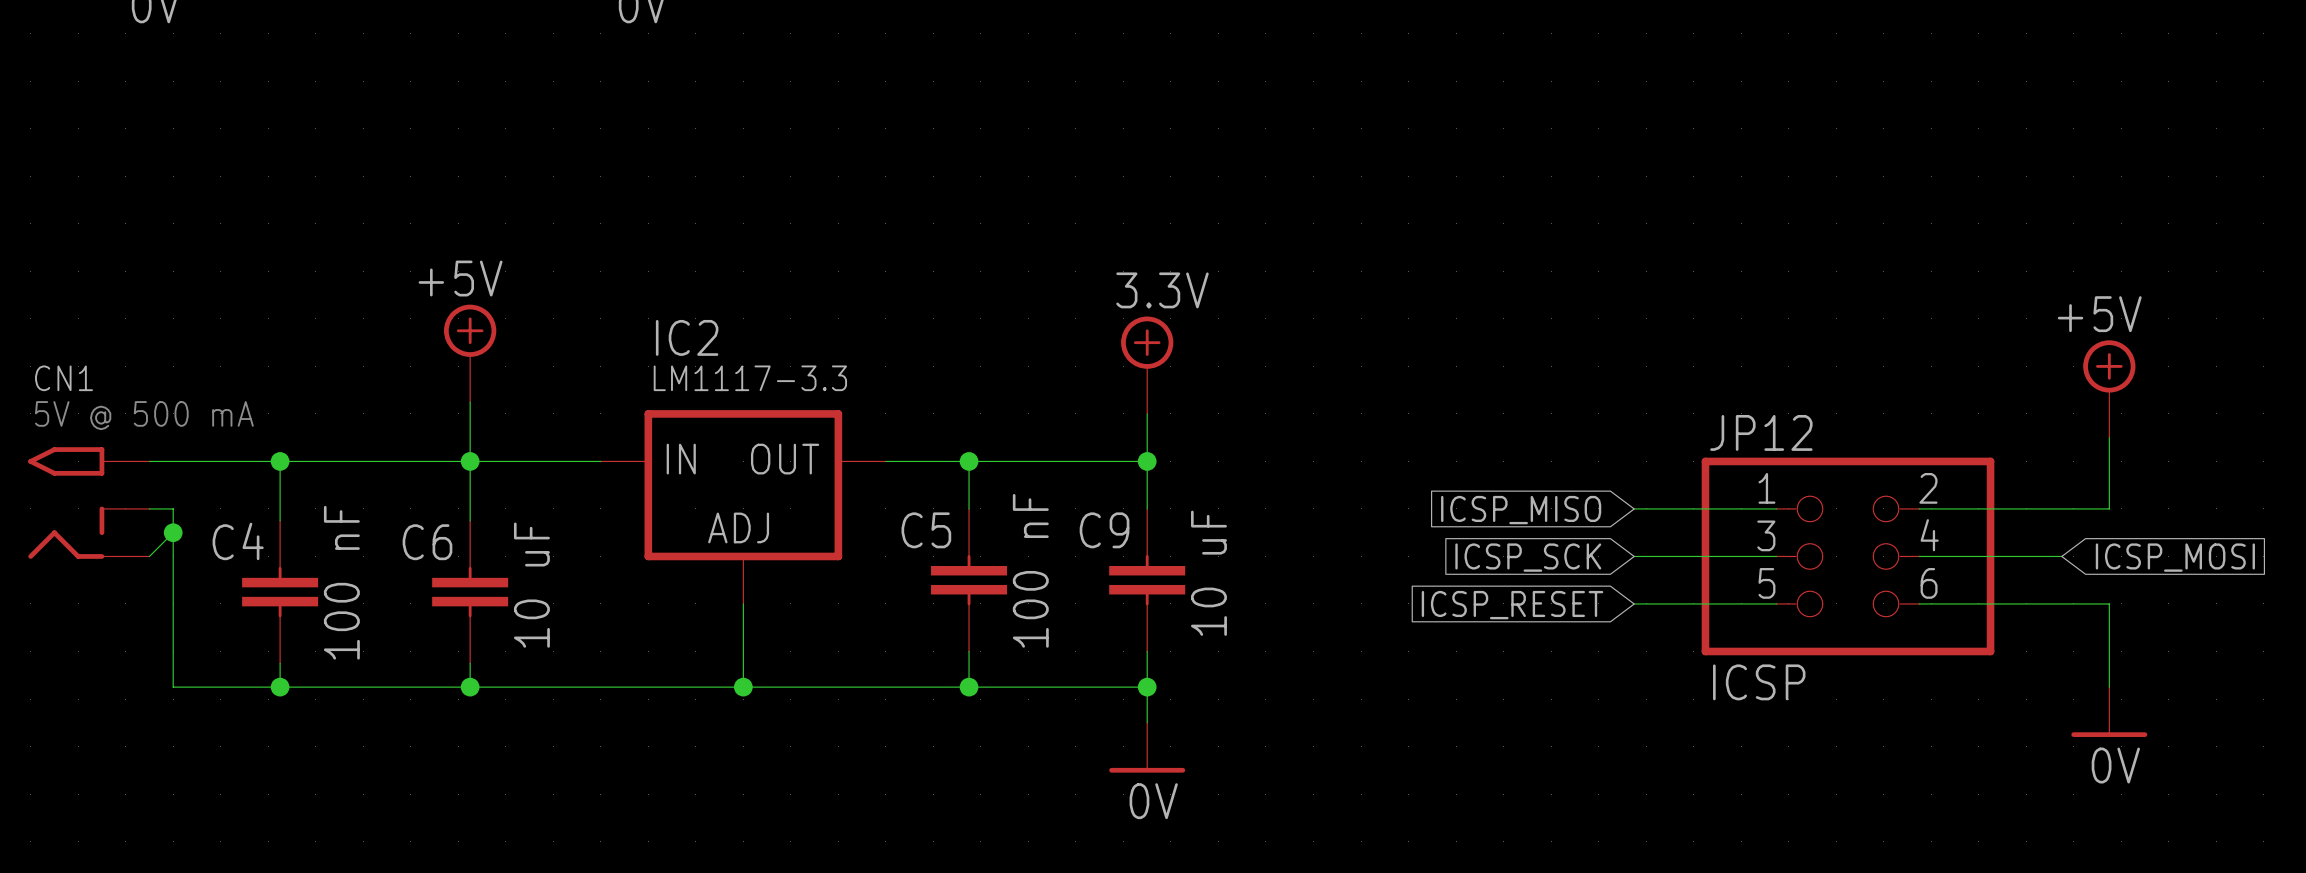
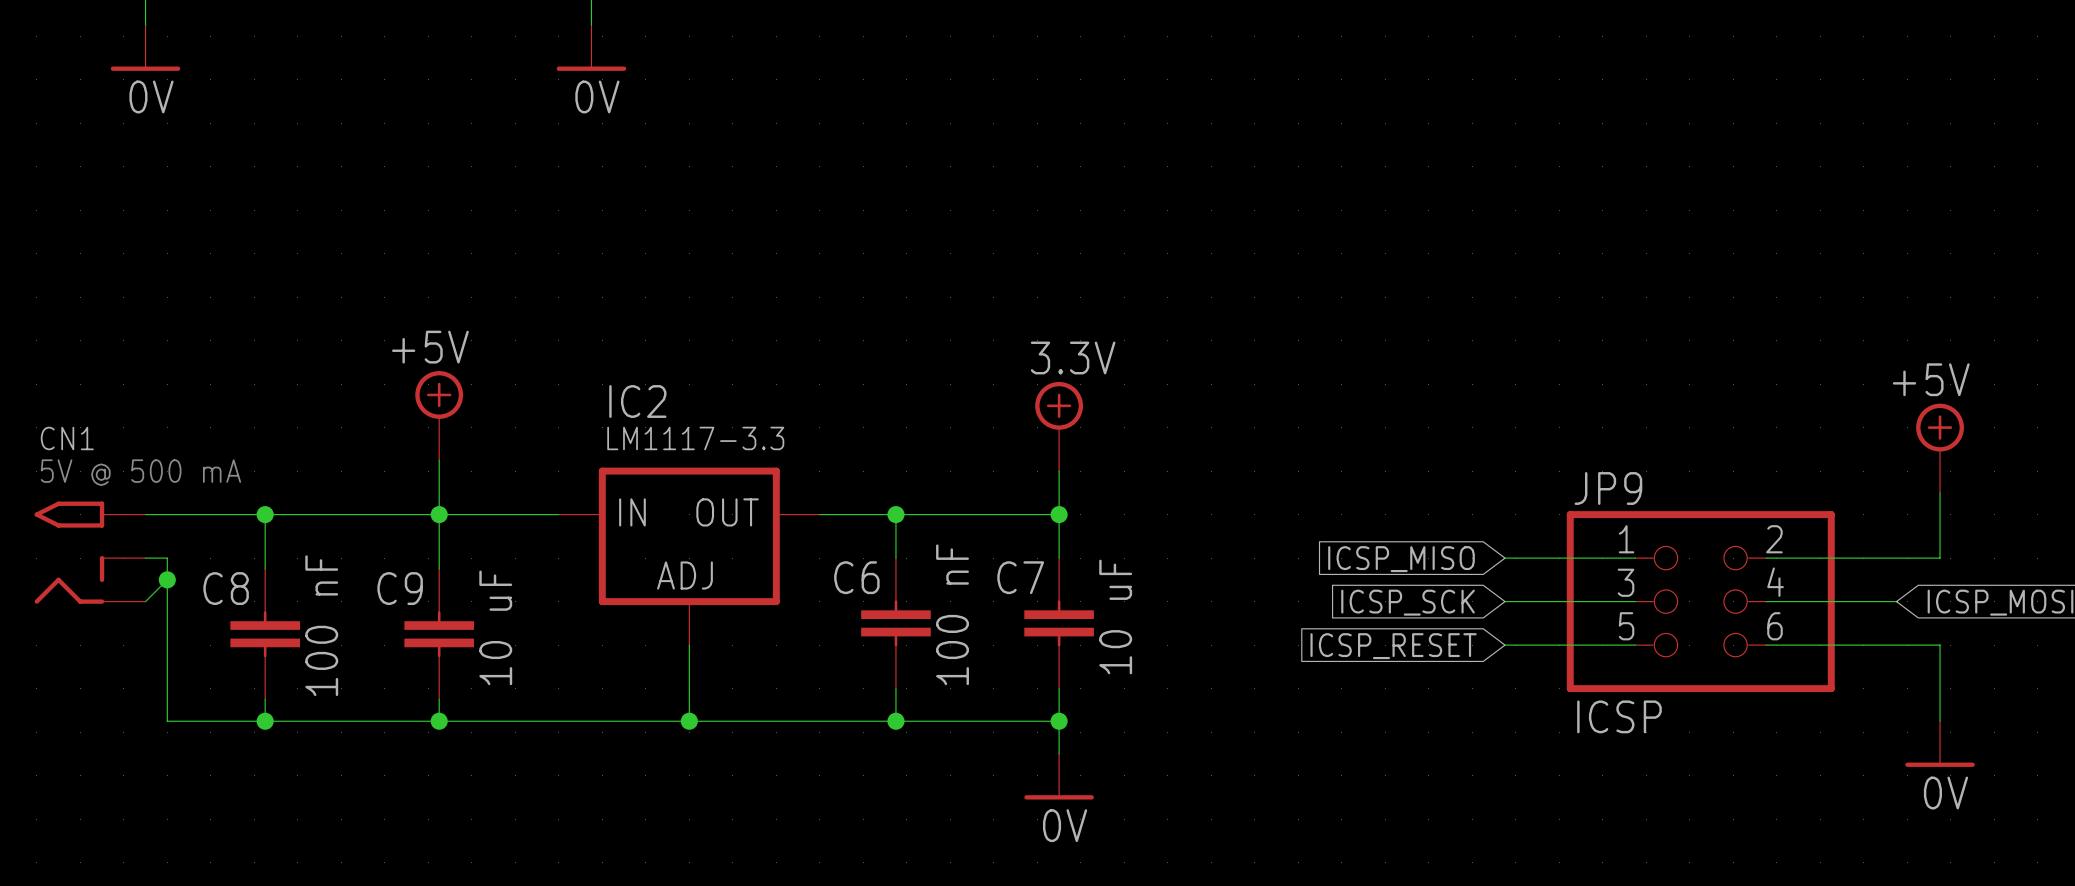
JP12 name: JP12 (1761, 432) -> JP9 (1608, 488)
C5 name: C5 (926, 530) -> C6 (856, 577)
C9 name: C9 (1104, 530) -> C7 (1020, 577)
C4 name: C4 (238, 541) -> C8 (226, 588)
C6 name: C6 (427, 542) -> C9 (400, 588)

